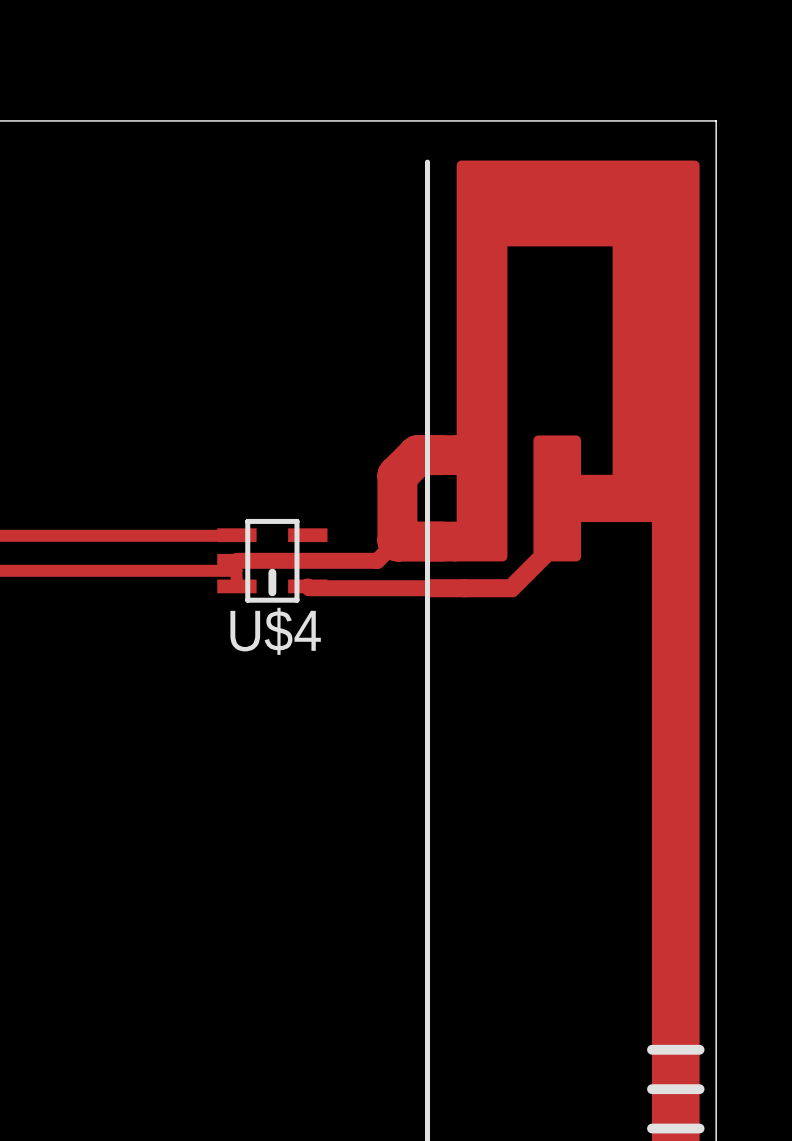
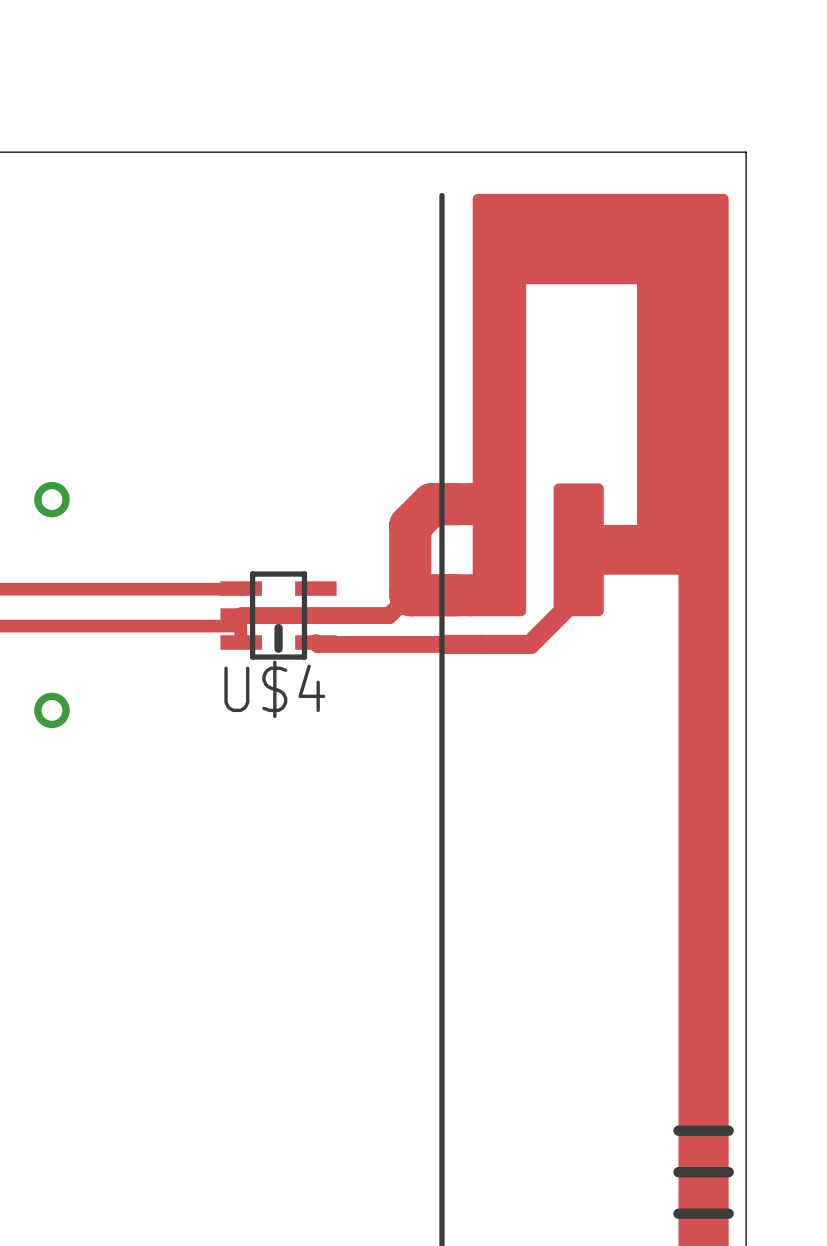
via: none -> (51, 499)
via: none -> (51, 710)

